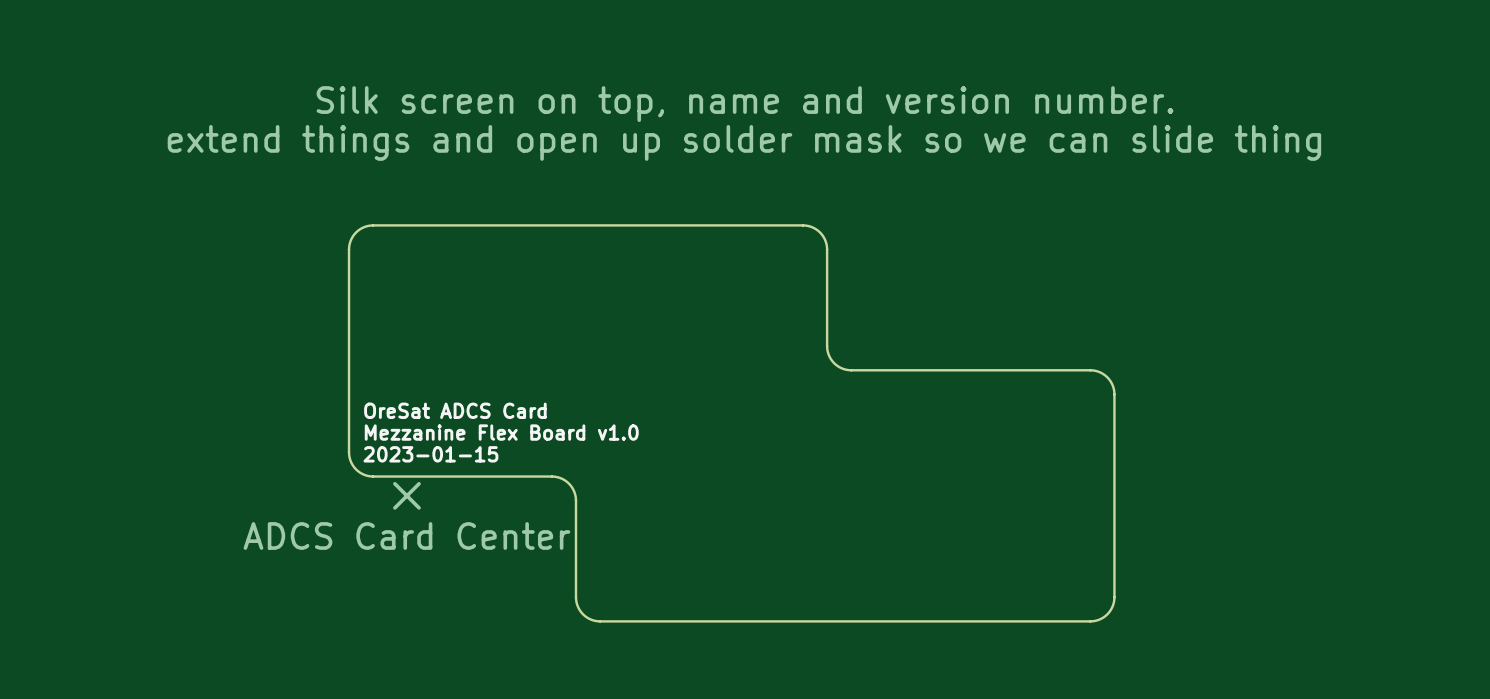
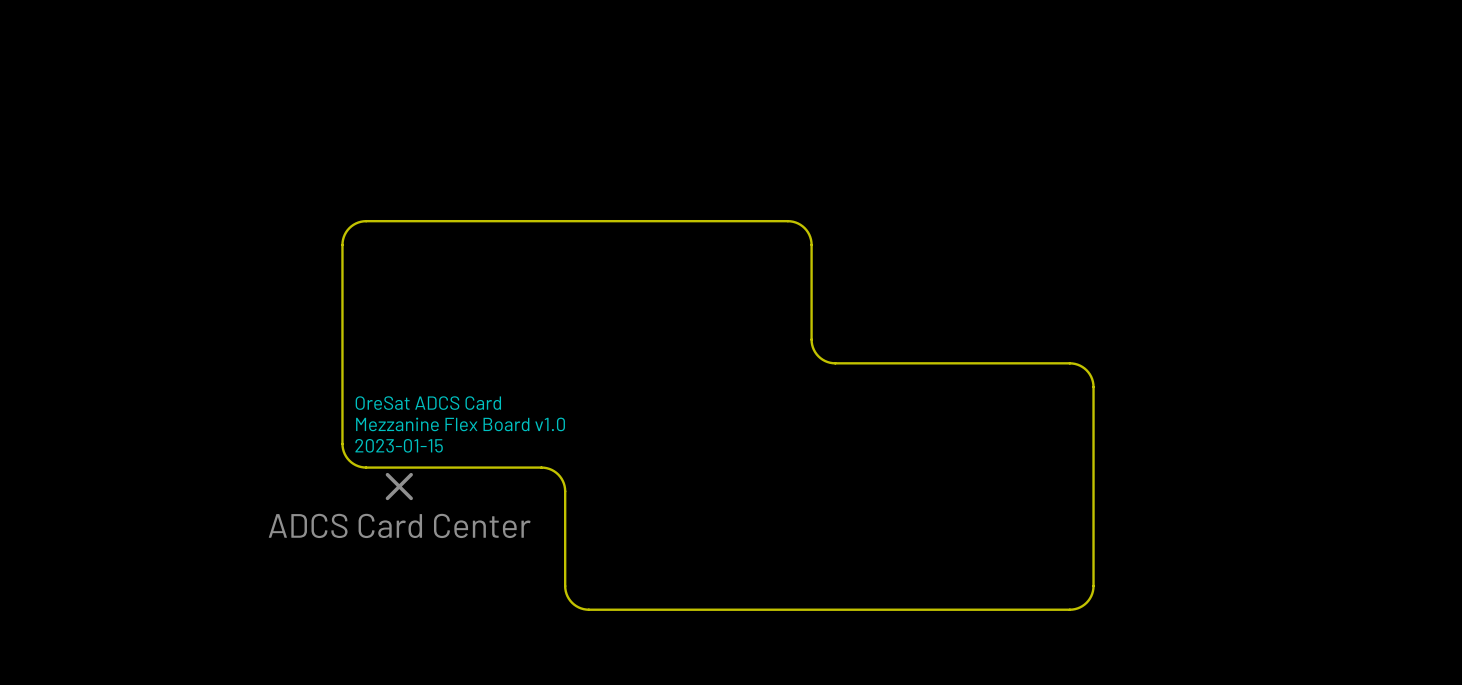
text: Silk screen on top, name and version number. (745, 104) -> none
text: extend things and open up solder mask so we can slide thing (744, 142) -> none

